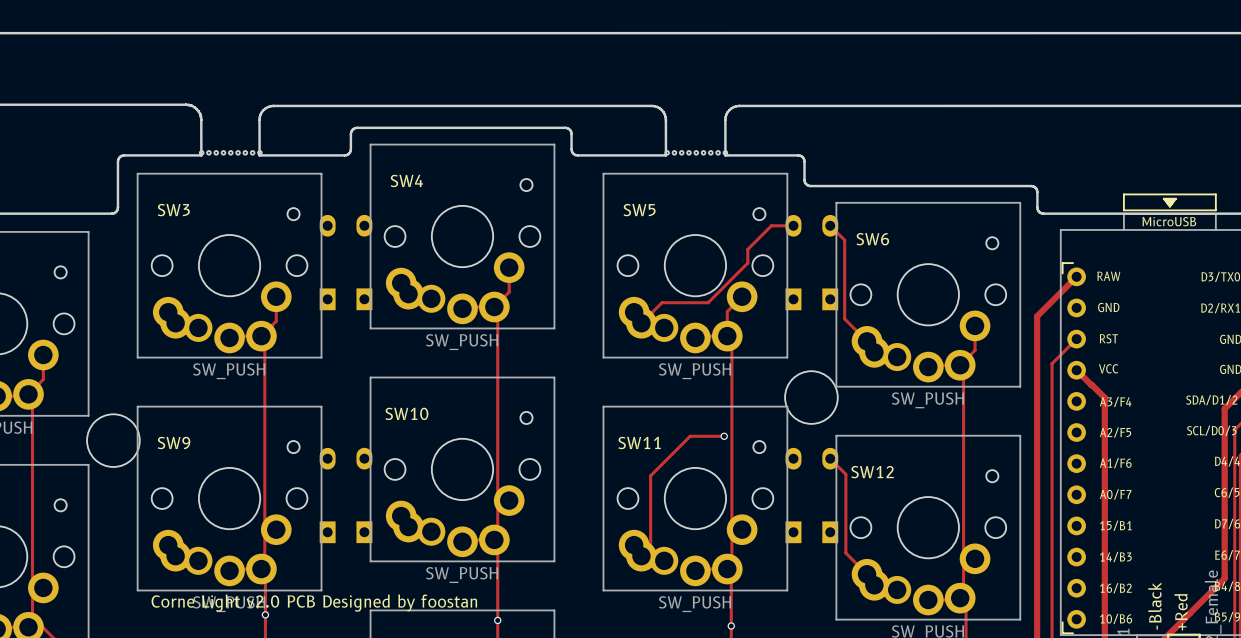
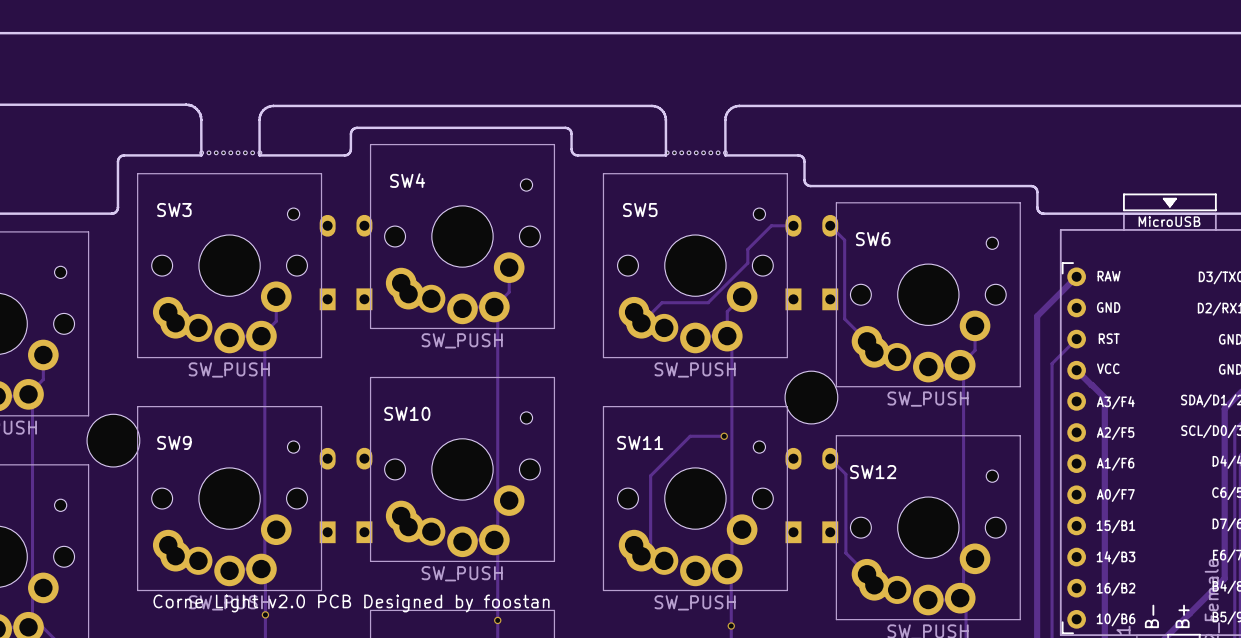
text: -Black (1154, 606) -> B- (1151, 616)
text: +Red (1181, 612) -> B+ (1182, 616)

